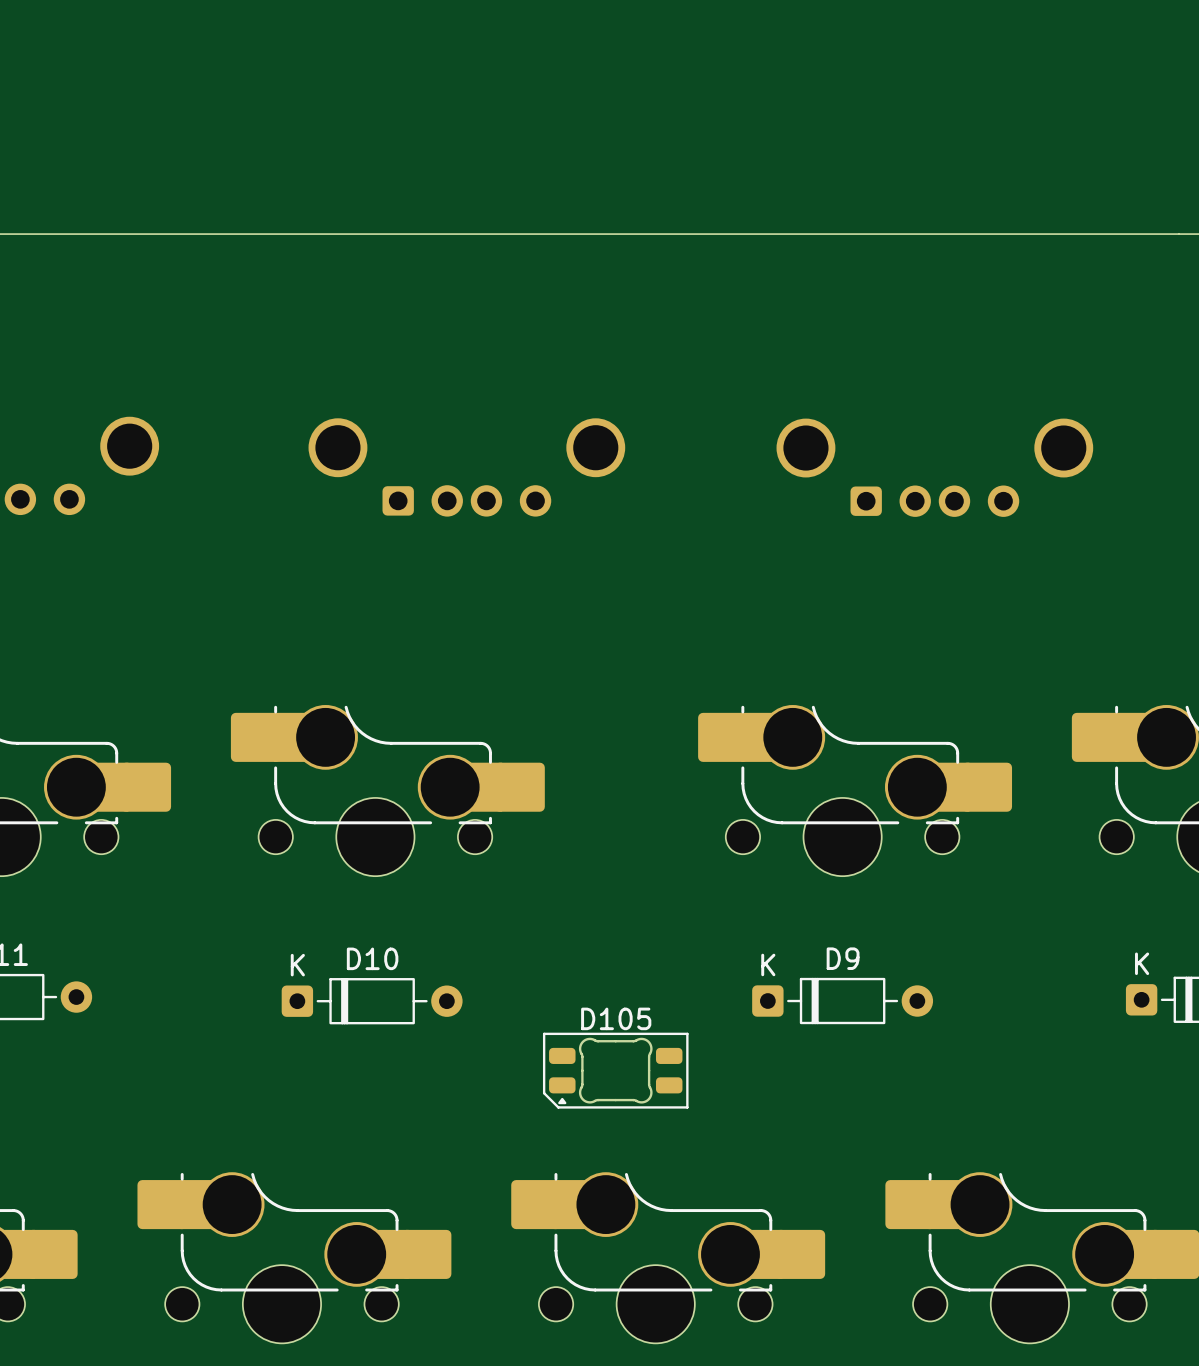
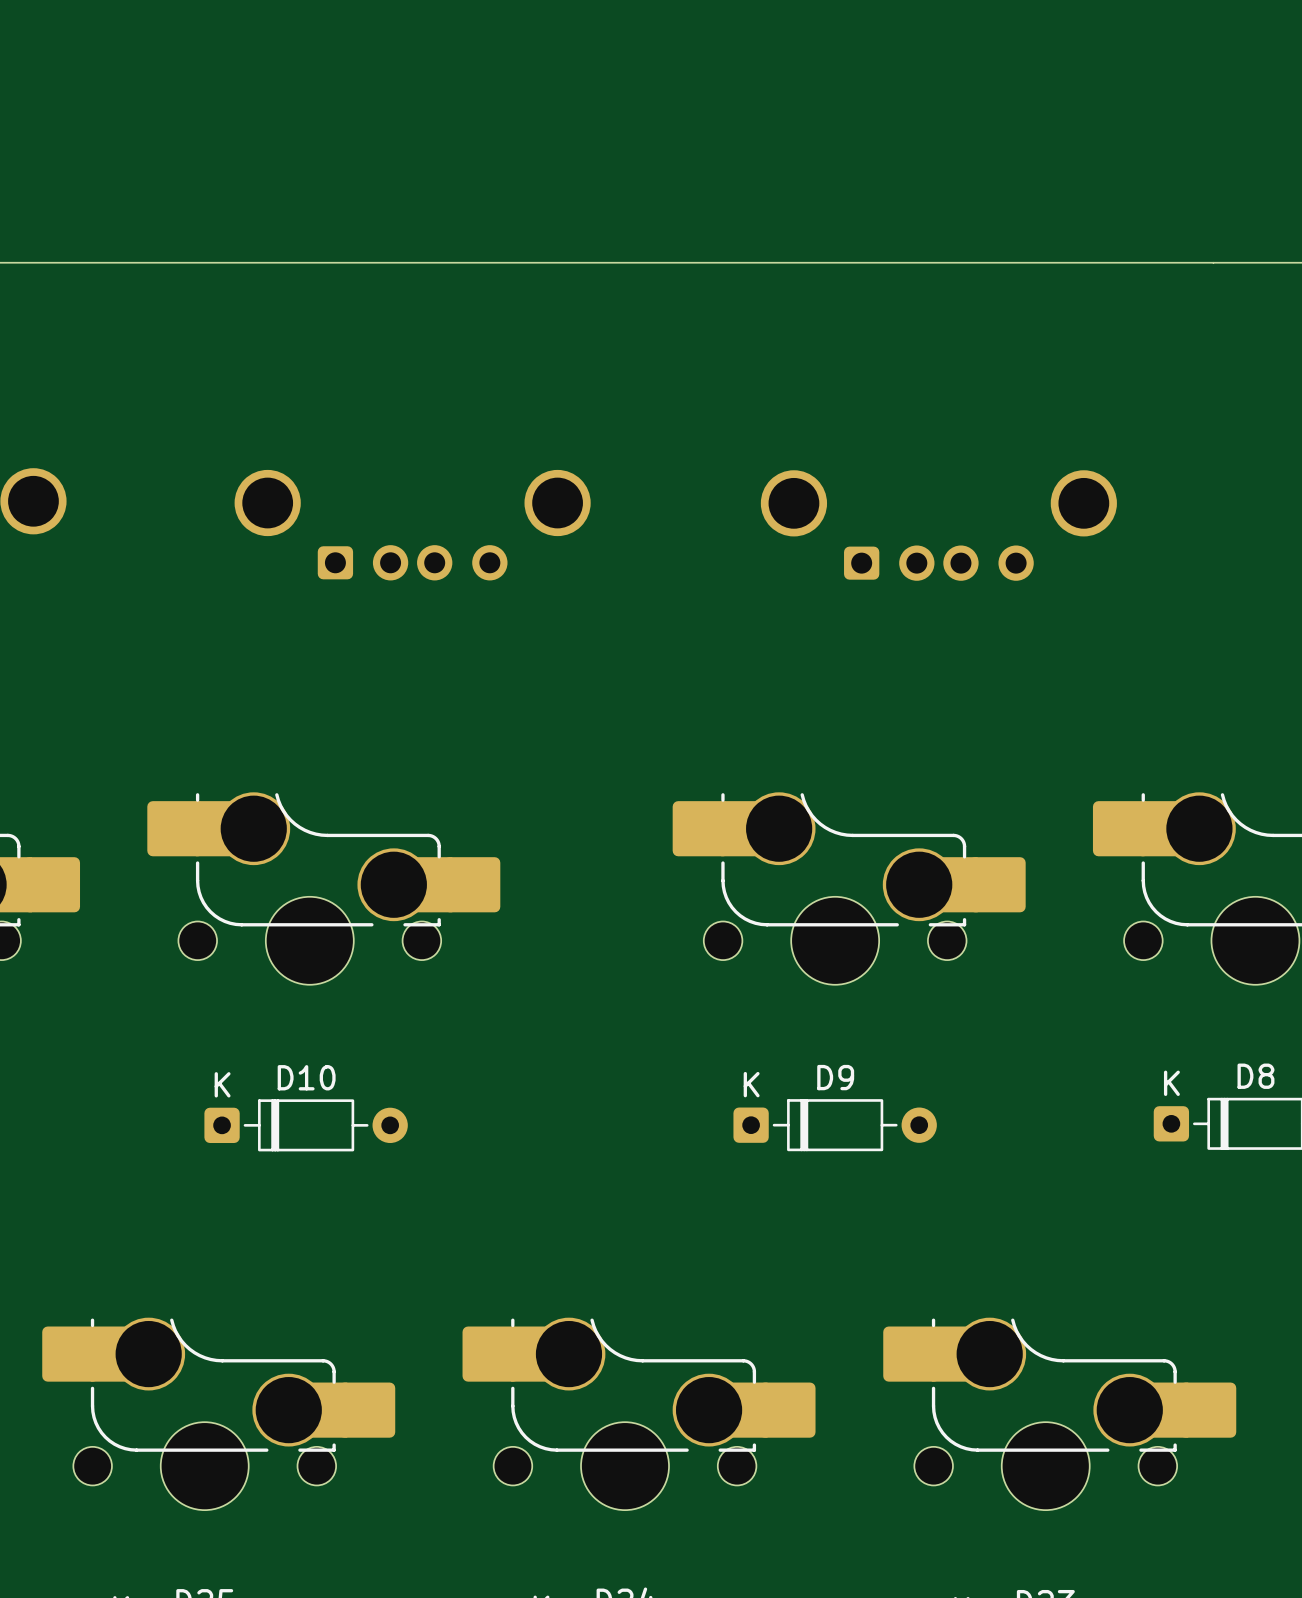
D105: (615, 1070) -> none

